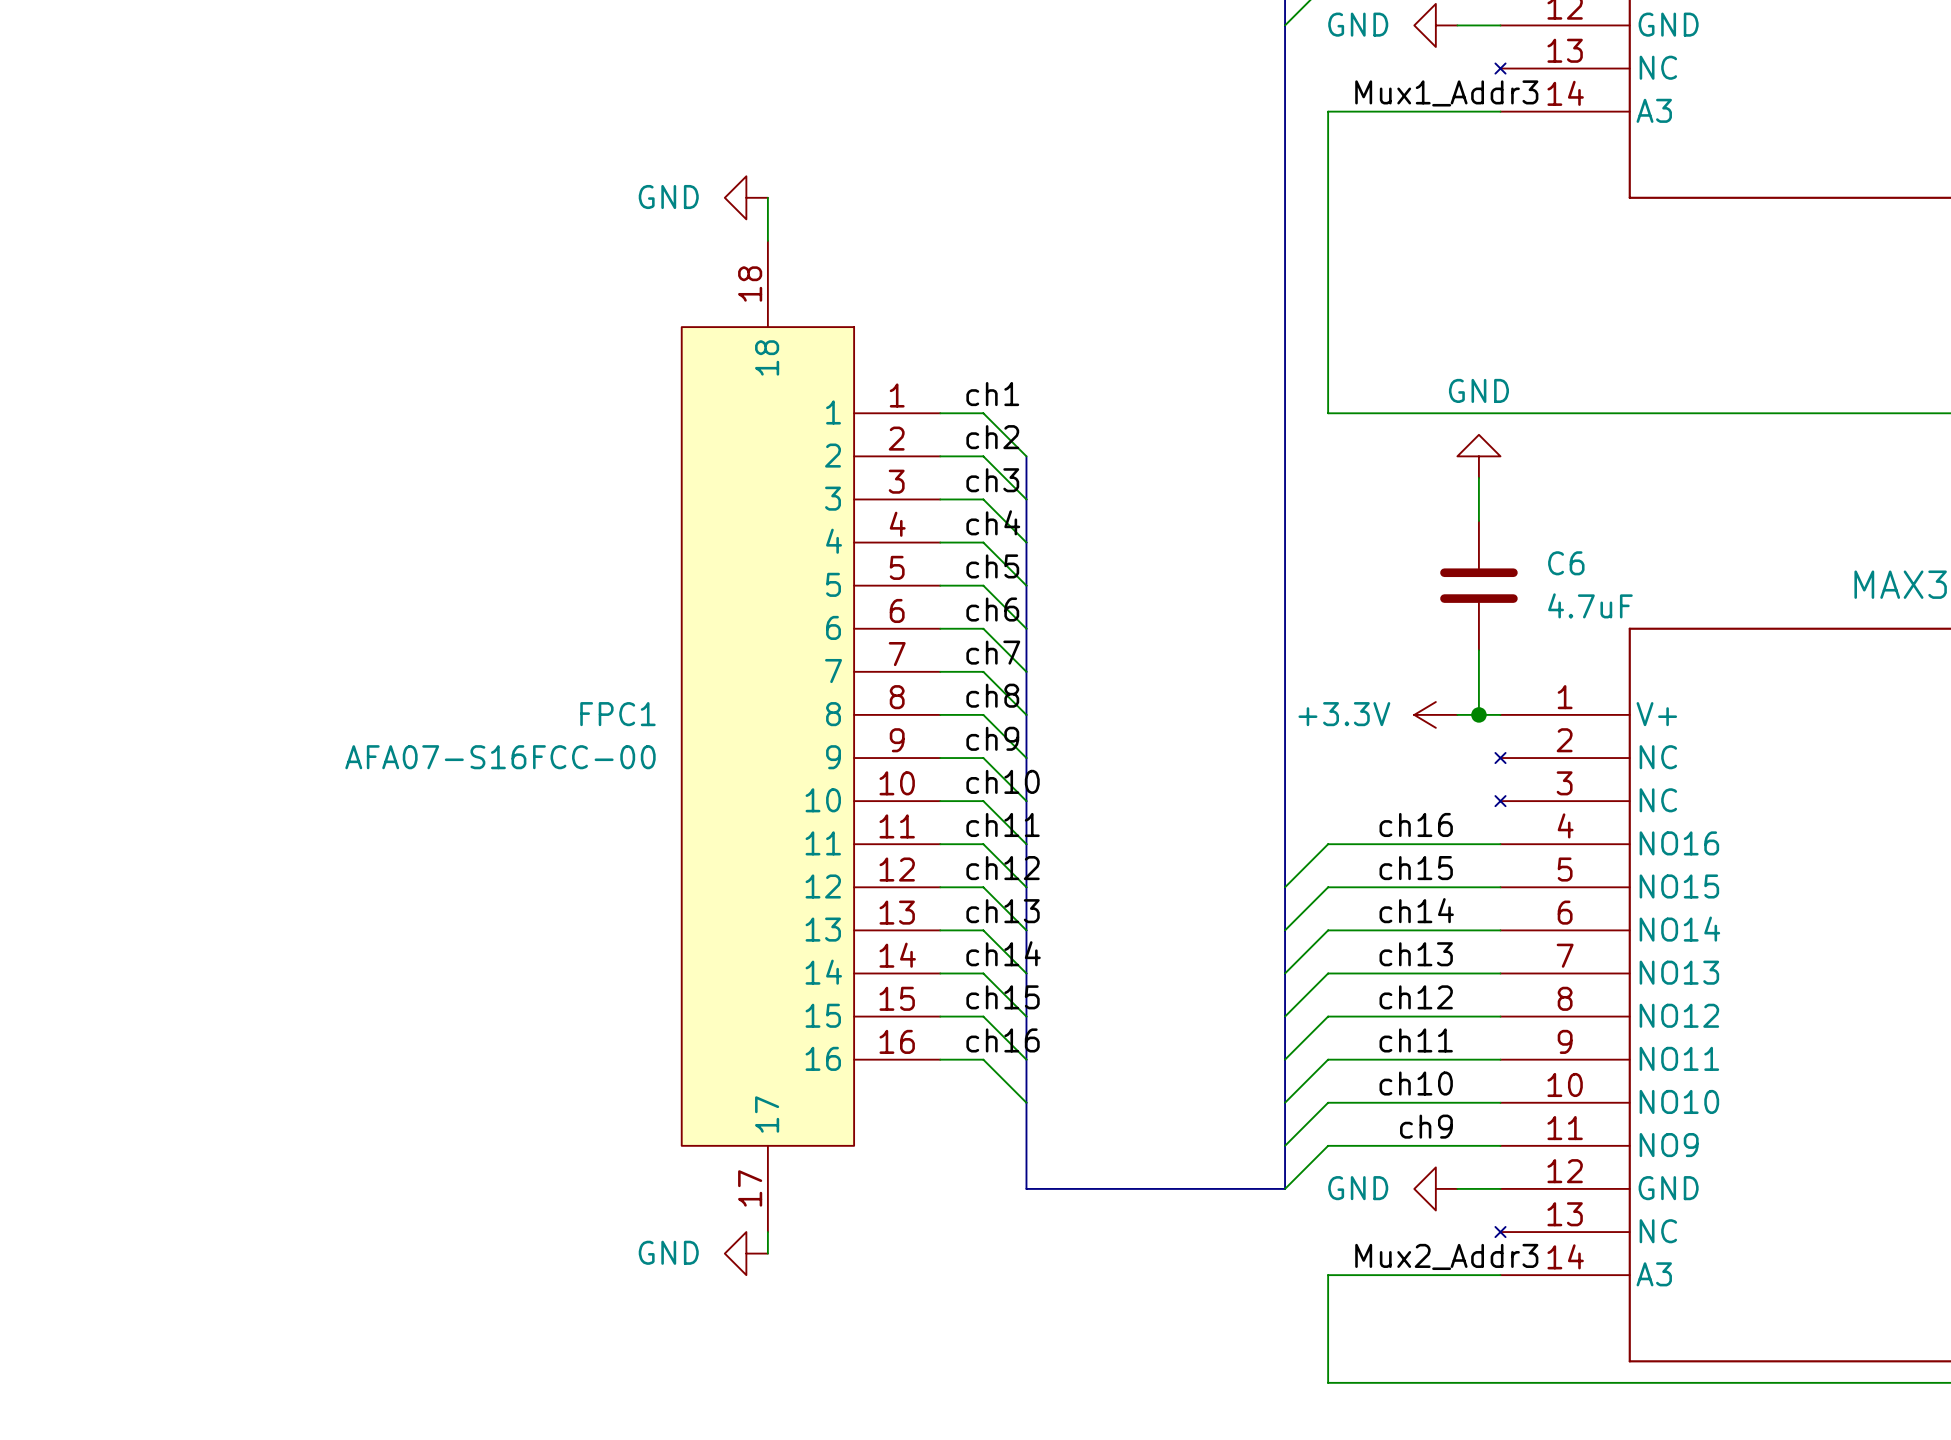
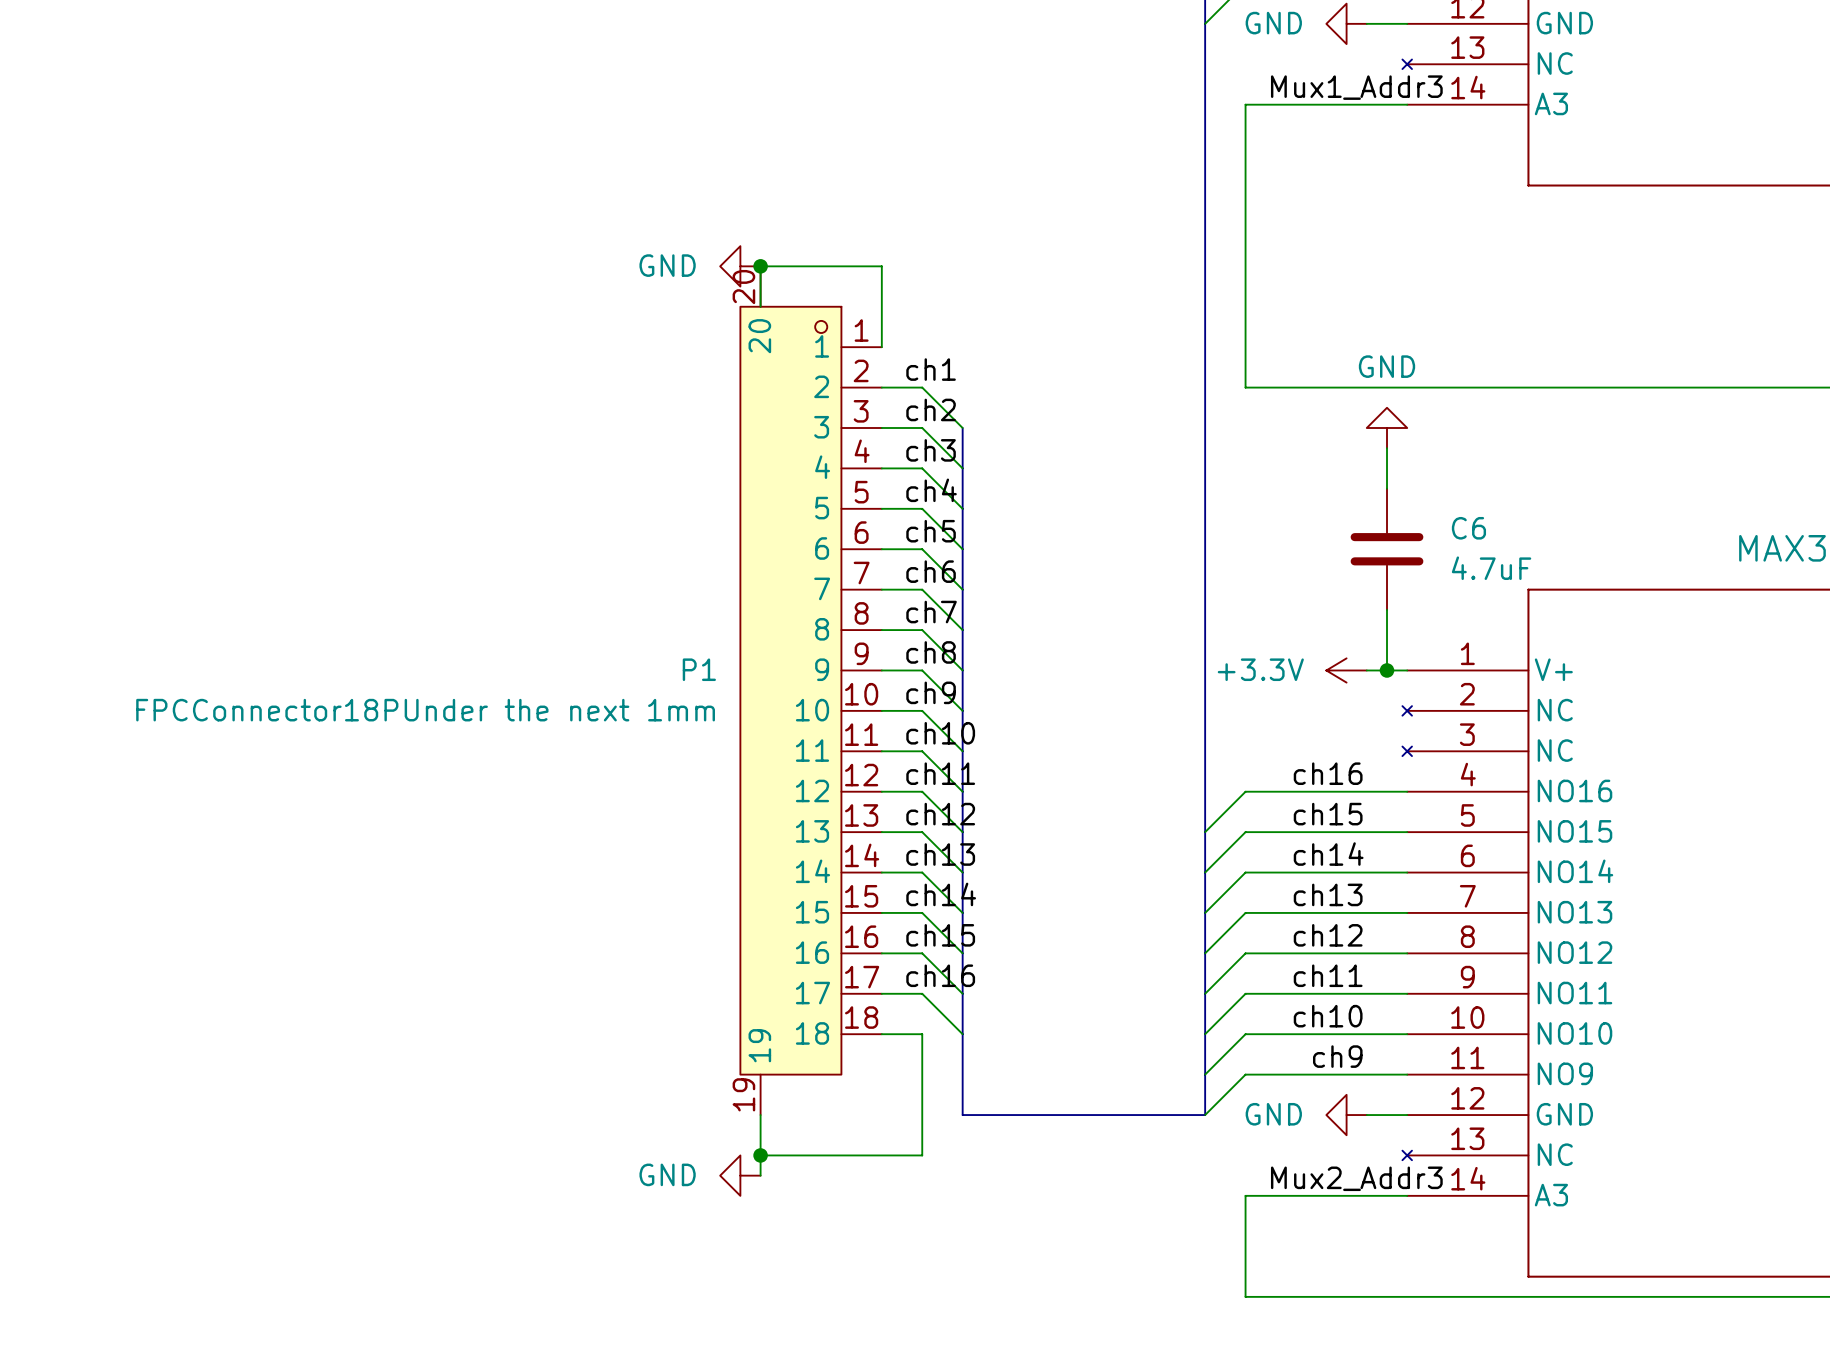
power symbol position: GND (746, 197) -> GND (740, 266)
wire: (767, 197) (767, 240) -> none
junction: none -> (760, 266)
wire: none -> (760, 306) (760, 266) (881, 266) (881, 347)
FPC1: AFA07-S16FCC-00 (811, 736) -> none
P1: none -> FPCConnector18PUnder the next 1mm (811, 690)
wire: none -> (881, 1034) (922, 1034) (922, 1155) (760, 1155)
wire: none -> (760, 1115) (760, 1175)
wire: (767, 1232) (767, 1253) -> none
junction: none -> (760, 1155)
power symbol position: GND (746, 1253) -> GND (740, 1175)

